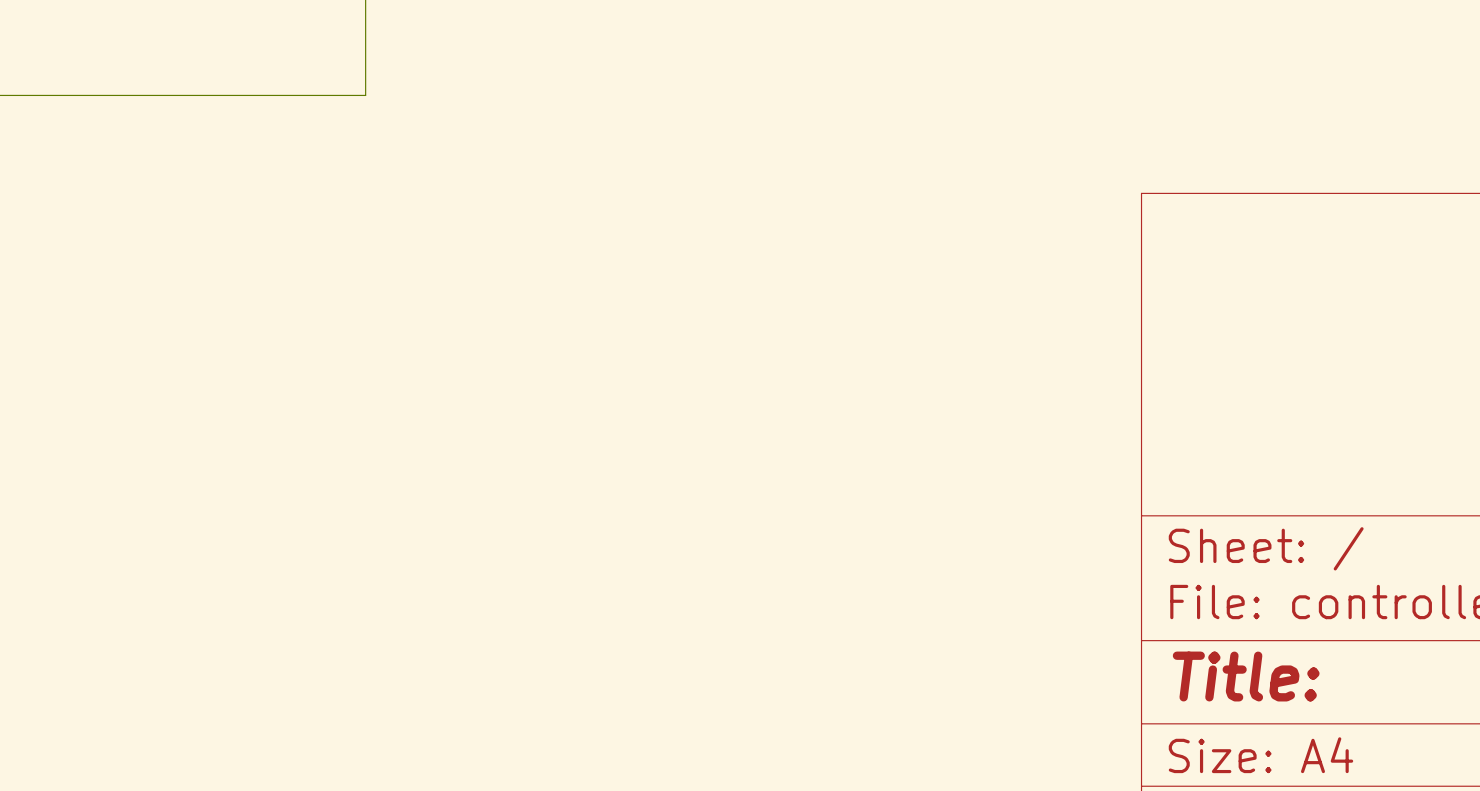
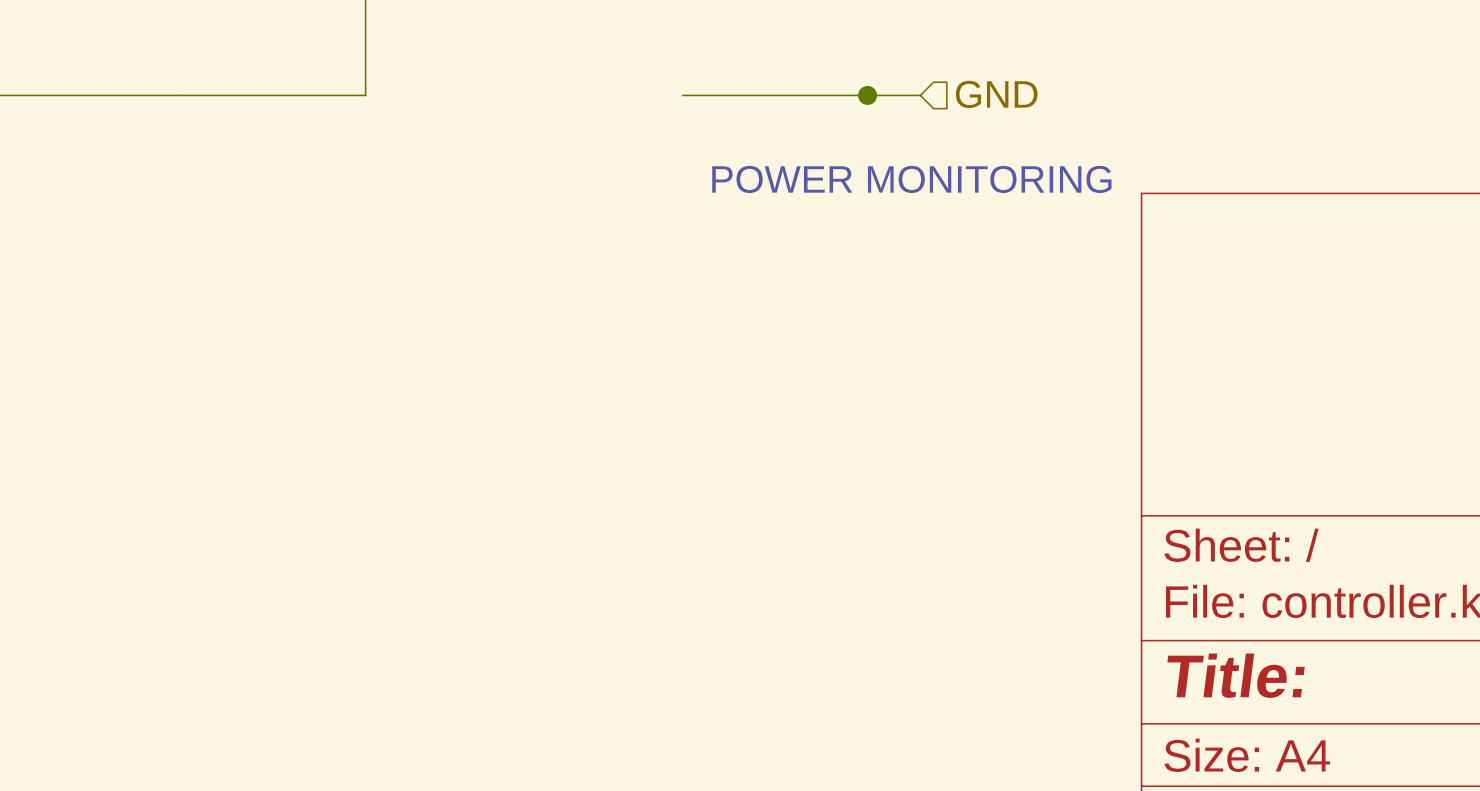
hierarchical label: none -> GND (996, 94)
wire: none -> (682, 95) (920, 95)
junction: none -> (867, 95)
text: none -> POWER MONITORING (911, 179)

